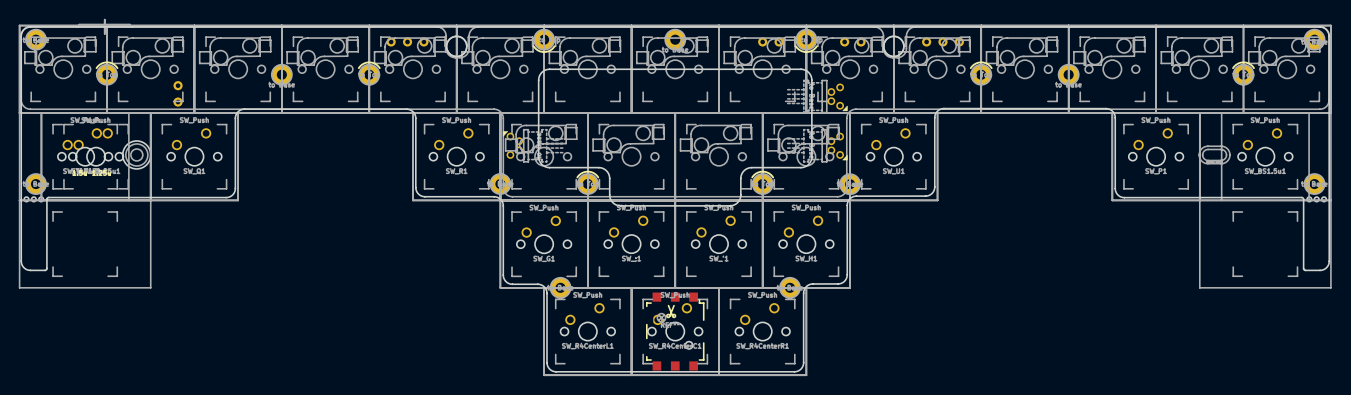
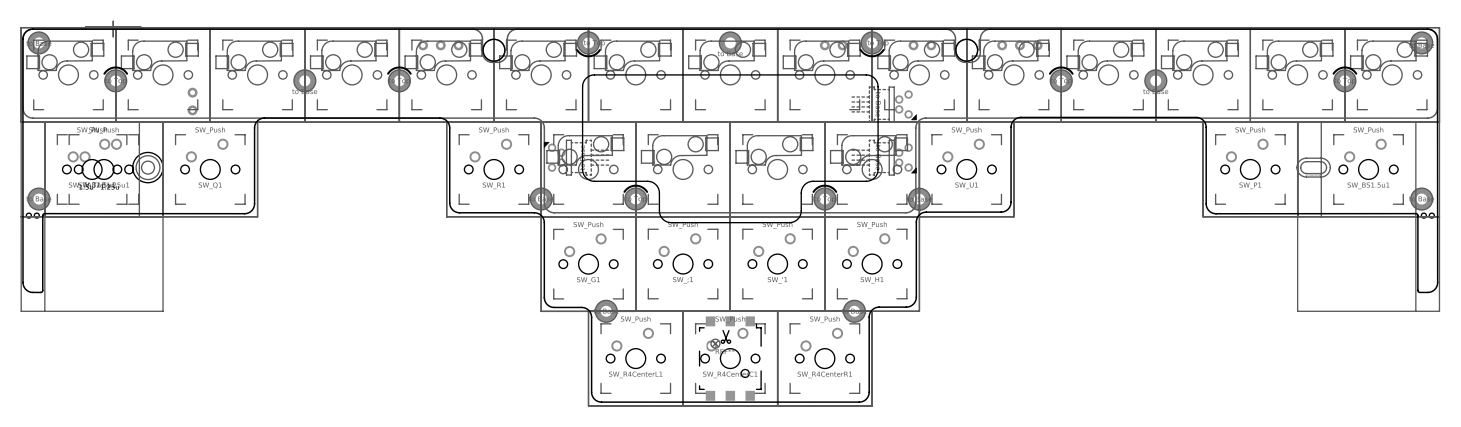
part footprint: [19, 19, 1332, 376] -> [20, 20, 1440, 407]

